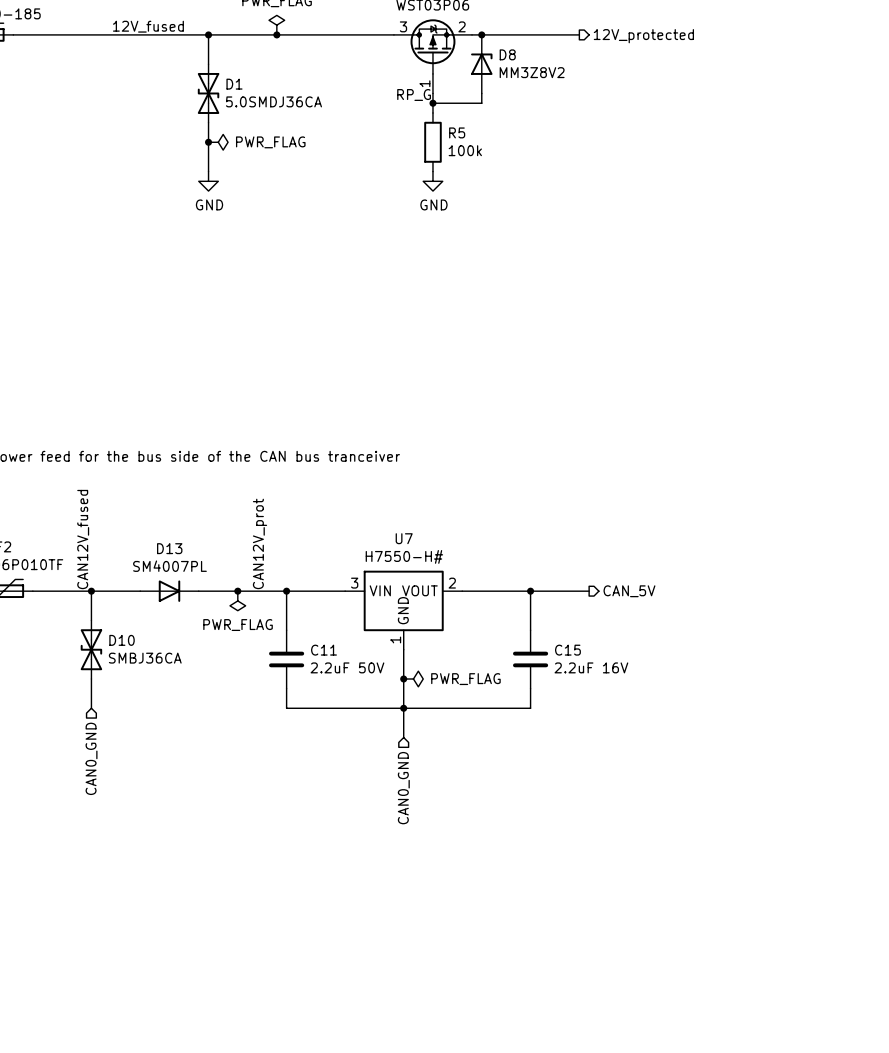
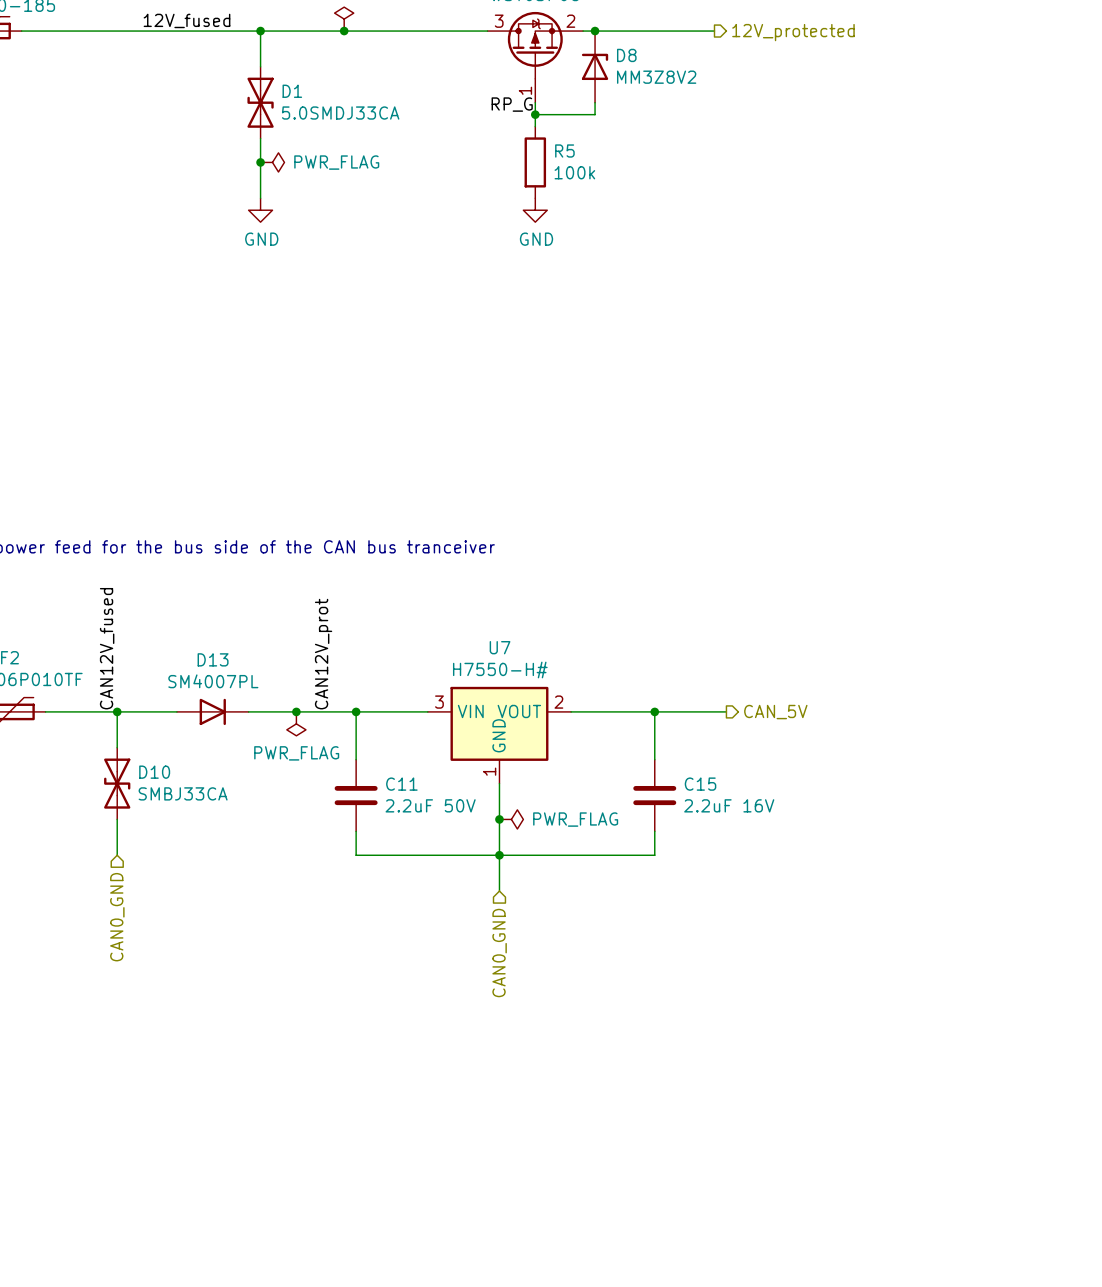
D1 value: 5.0SMDJ36CA (273, 101) -> 5.0SMDJ33CA (340, 113)
D10 value: SMBJ36CA (145, 658) -> SMBJ33CA (183, 793)

